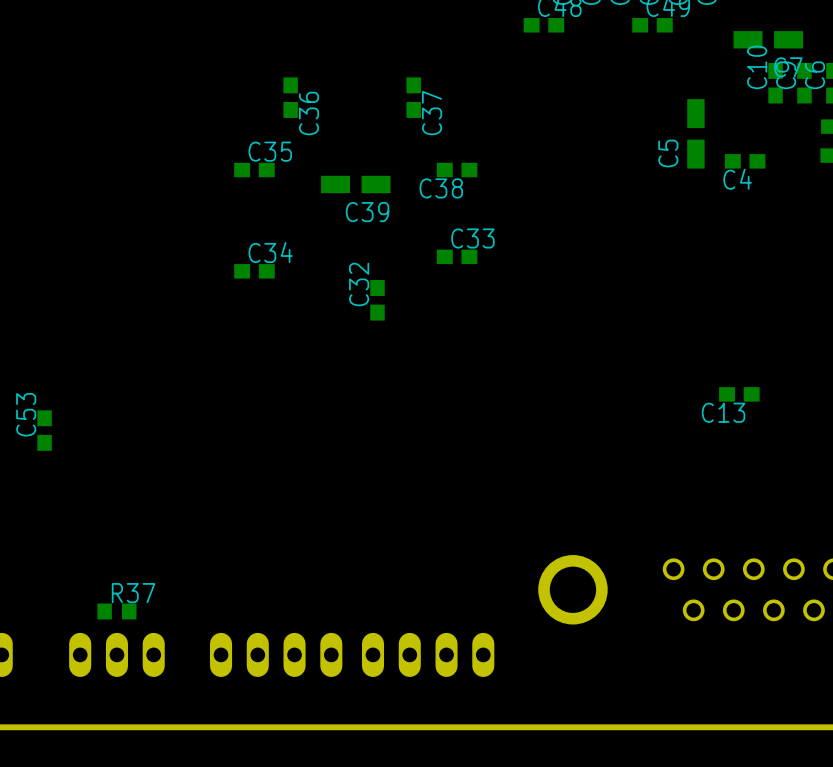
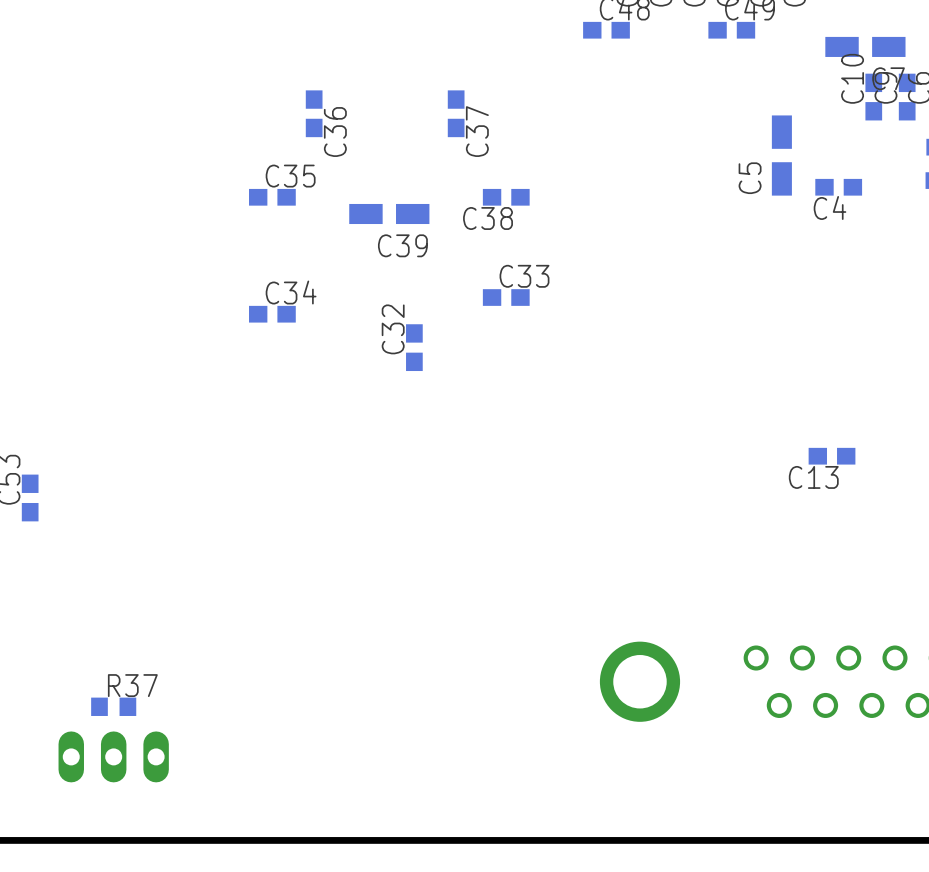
part: (276, 654) -> none
part: (428, 654) -> none

